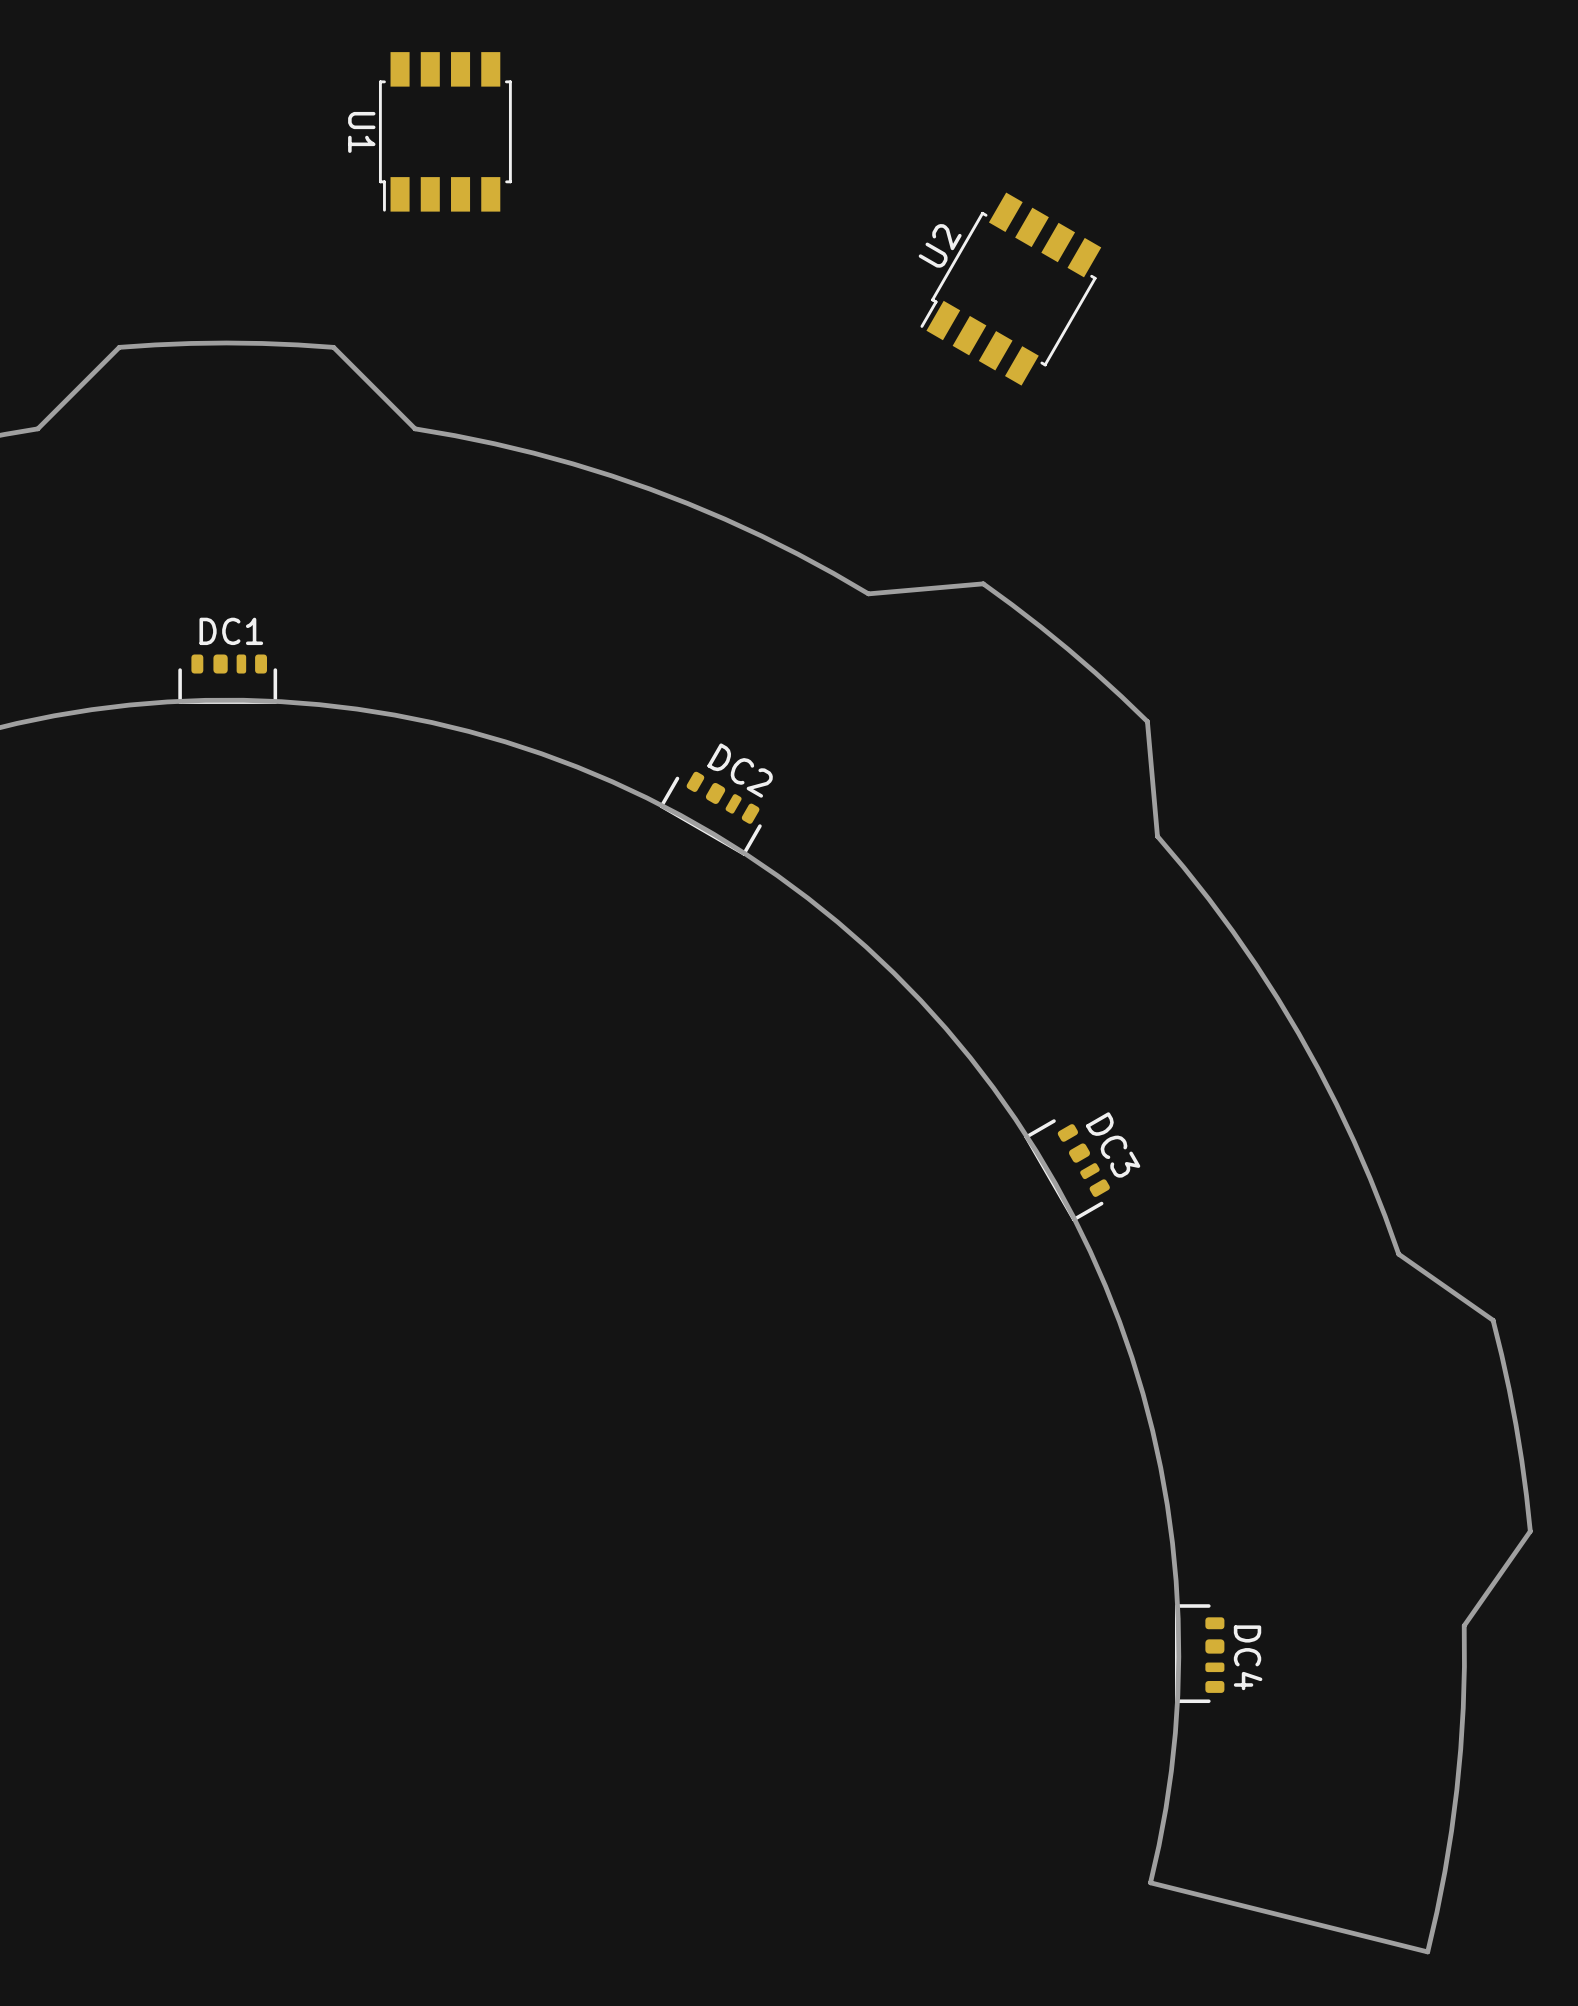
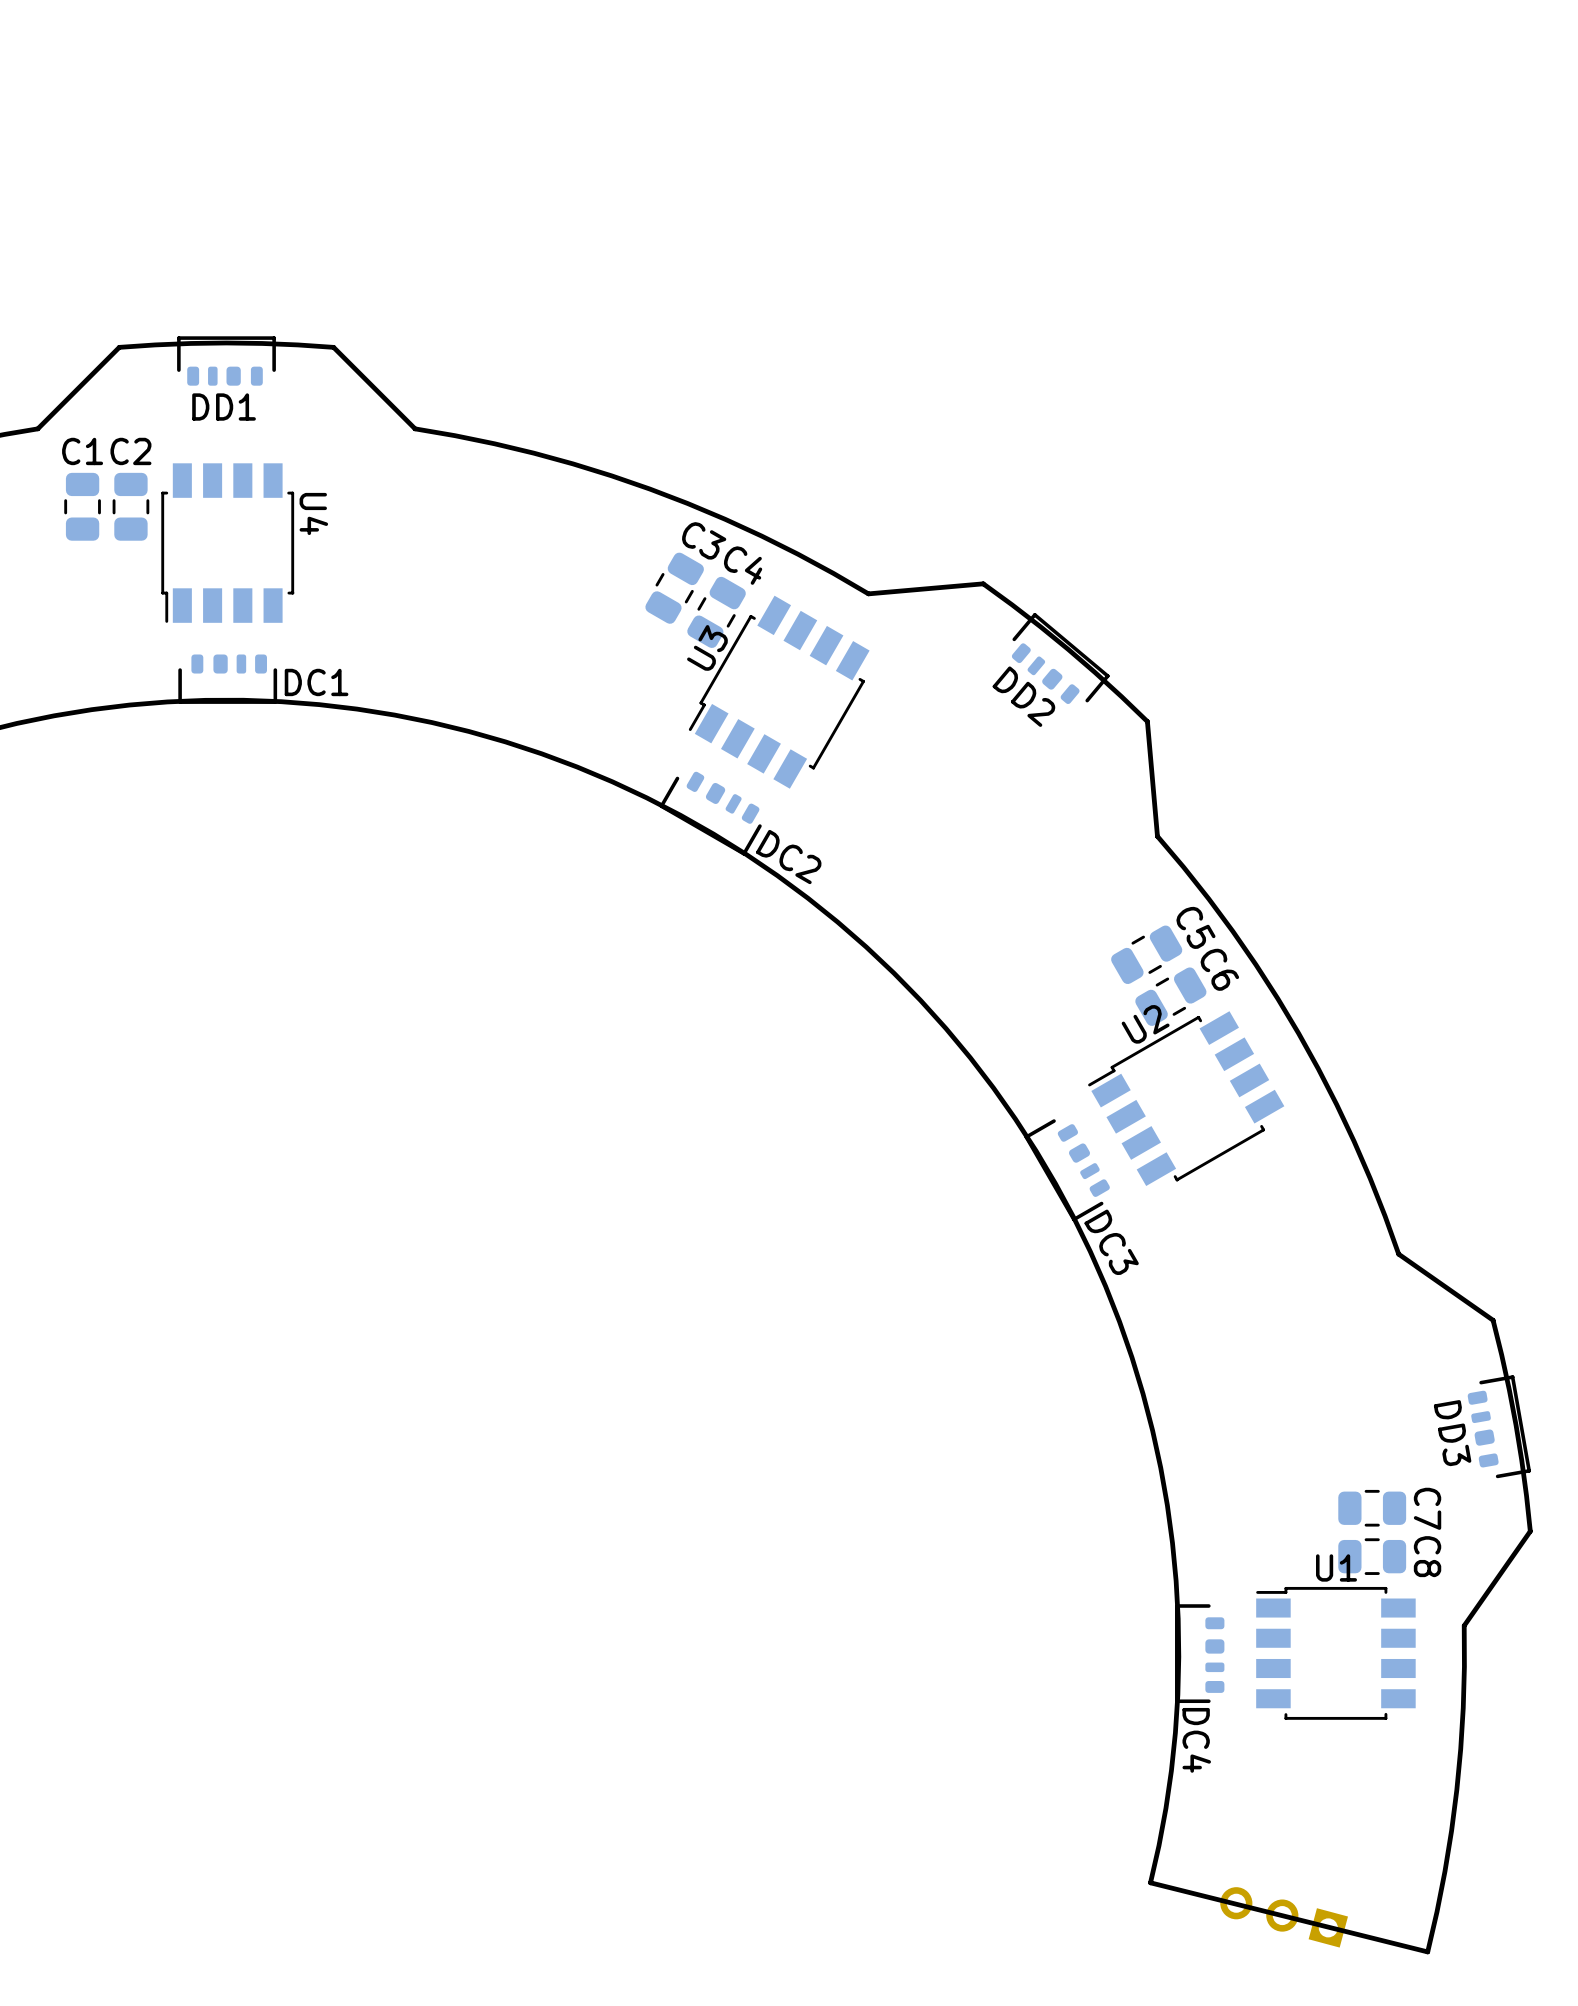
U1 rotation: 0° (445, 131) -> 90° clockwise (1335, 1653)
U1 position: (445, 131) -> (1335, 1653)
U2 rotation: 0° (1010, 289) -> 30° clockwise (1186, 1098)
U2 position: (1010, 289) -> (1186, 1098)
DD1: none -> (226, 360)
C1: none -> (82, 506)
C2: none -> (130, 506)
U4: none -> (227, 543)
C3: none -> (674, 588)
C4: none -> (716, 612)
DC1 name position: DC1 (231, 631) -> DC1 (316, 682)
DD2: none -> (1060, 658)
U3: none -> (779, 692)
DC2 name position: DC2 (740, 770) -> DC2 (788, 857)
C5: none -> (1146, 954)
C6: none -> (1170, 996)
DC3 name position: DC3 (1113, 1144) -> DC3 (1111, 1242)
DD3: none -> (1499, 1426)
C7: none -> (1372, 1508)
C8: none -> (1372, 1556)
DC4 name position: DC4 (1248, 1657) -> DC4 (1196, 1740)
part: none -> (1284, 1917)

